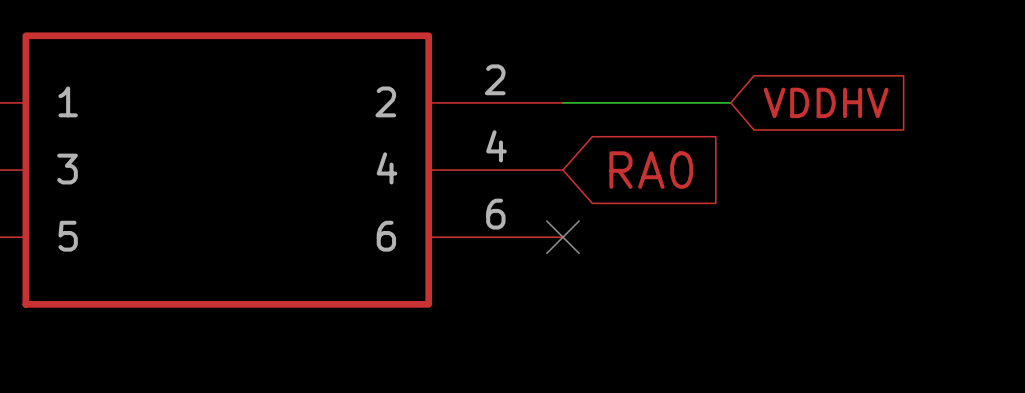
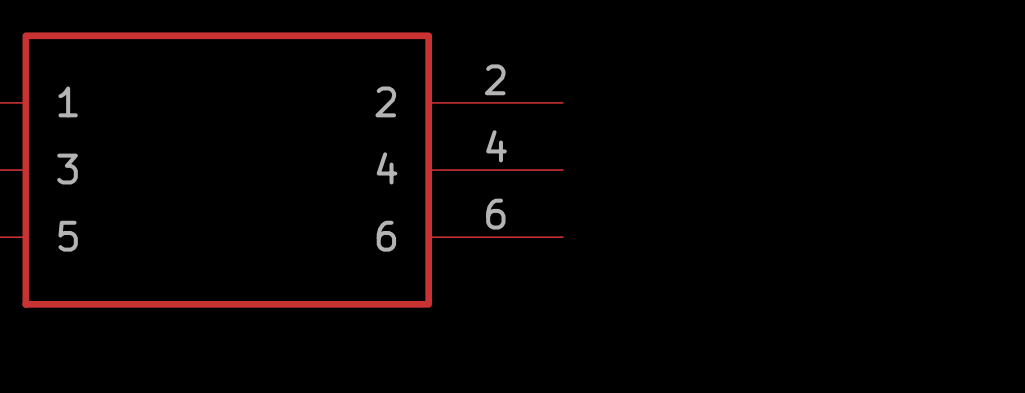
wire: (562, 102) (730, 102) -> none
global label: VDDHV (826, 102) -> none
global label: RA0 (651, 170) -> none
no-connect mark: (562, 237) -> none

